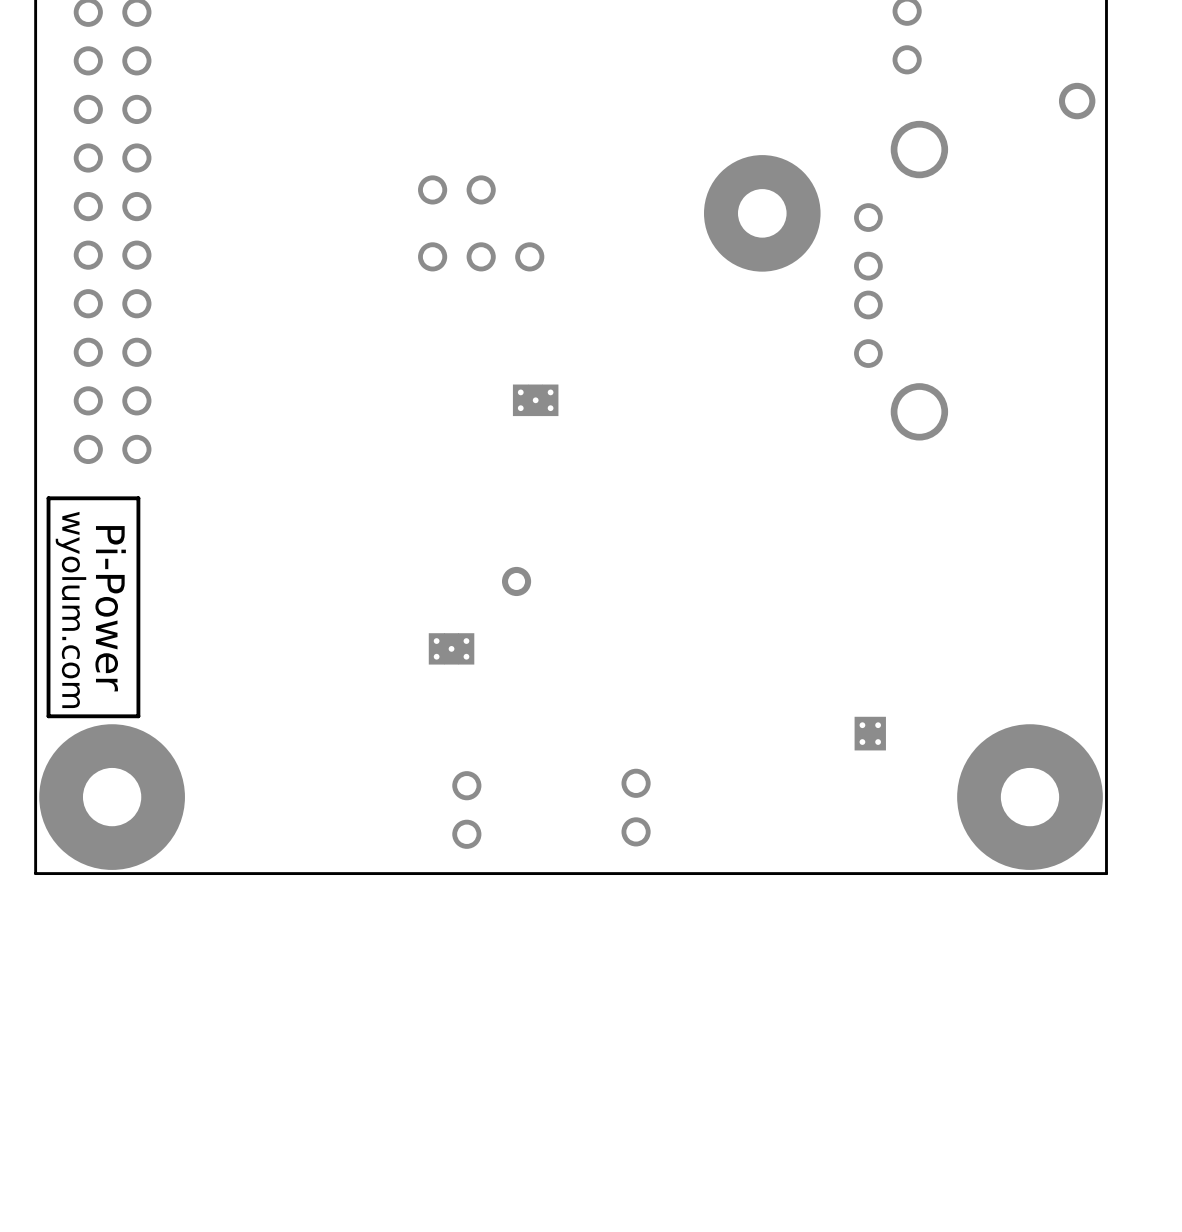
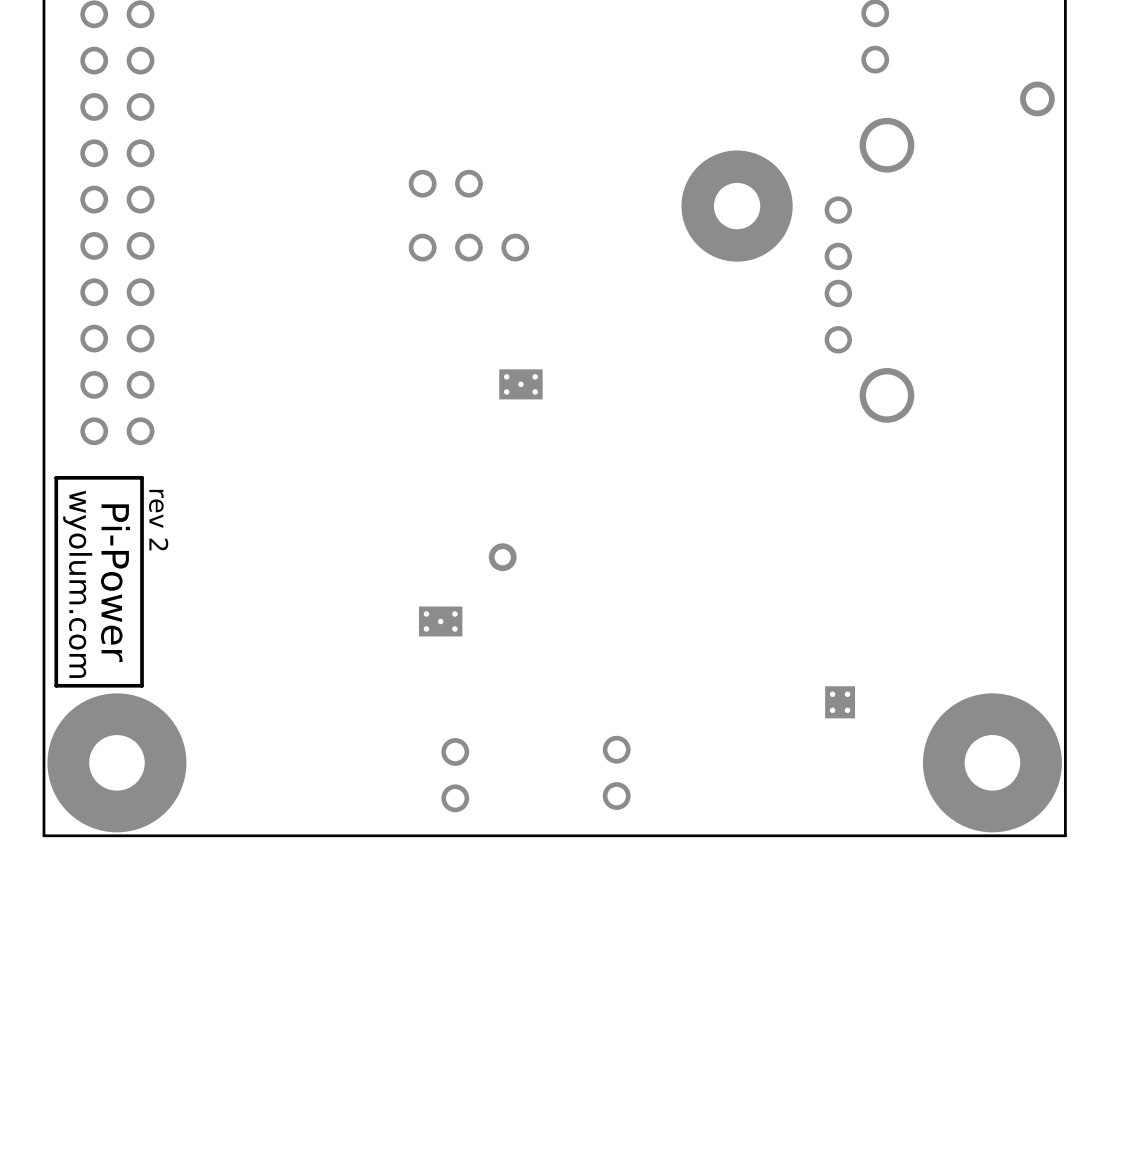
text: none -> rev 2 (158, 520)

